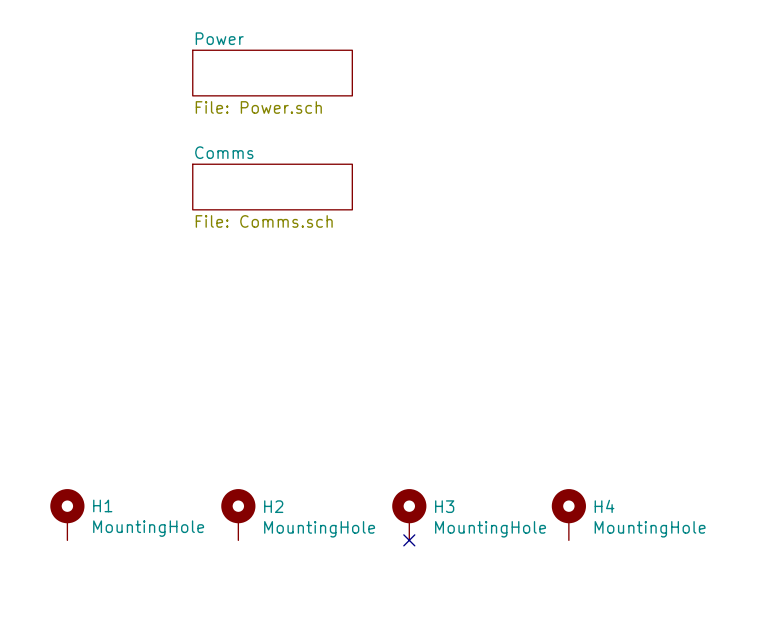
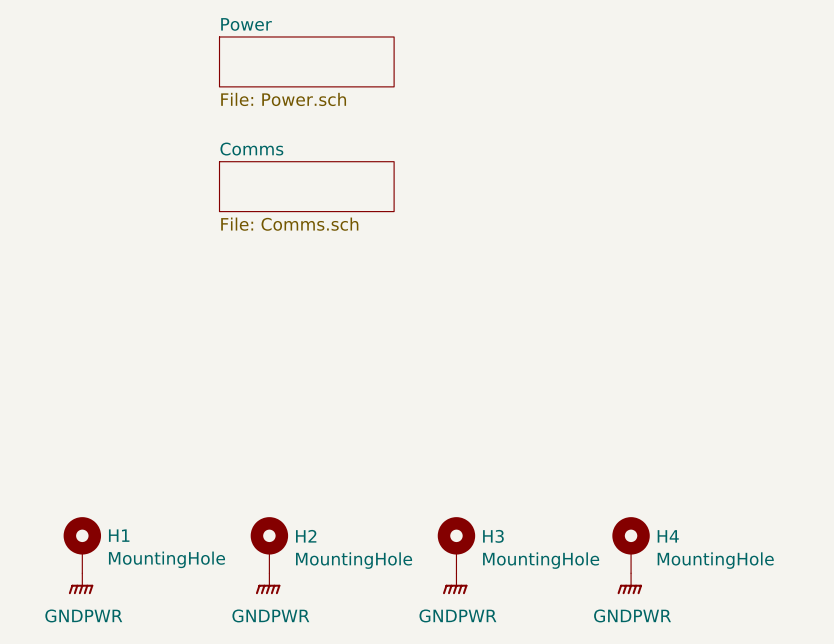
no-connect mark: (409, 540) -> none
power symbol: none -> GNDPWR (81, 583)
power symbol: none -> GNDPWR (268, 583)
power symbol: none -> GNDPWR (455, 583)
power symbol: none -> GNDPWR (629, 583)

